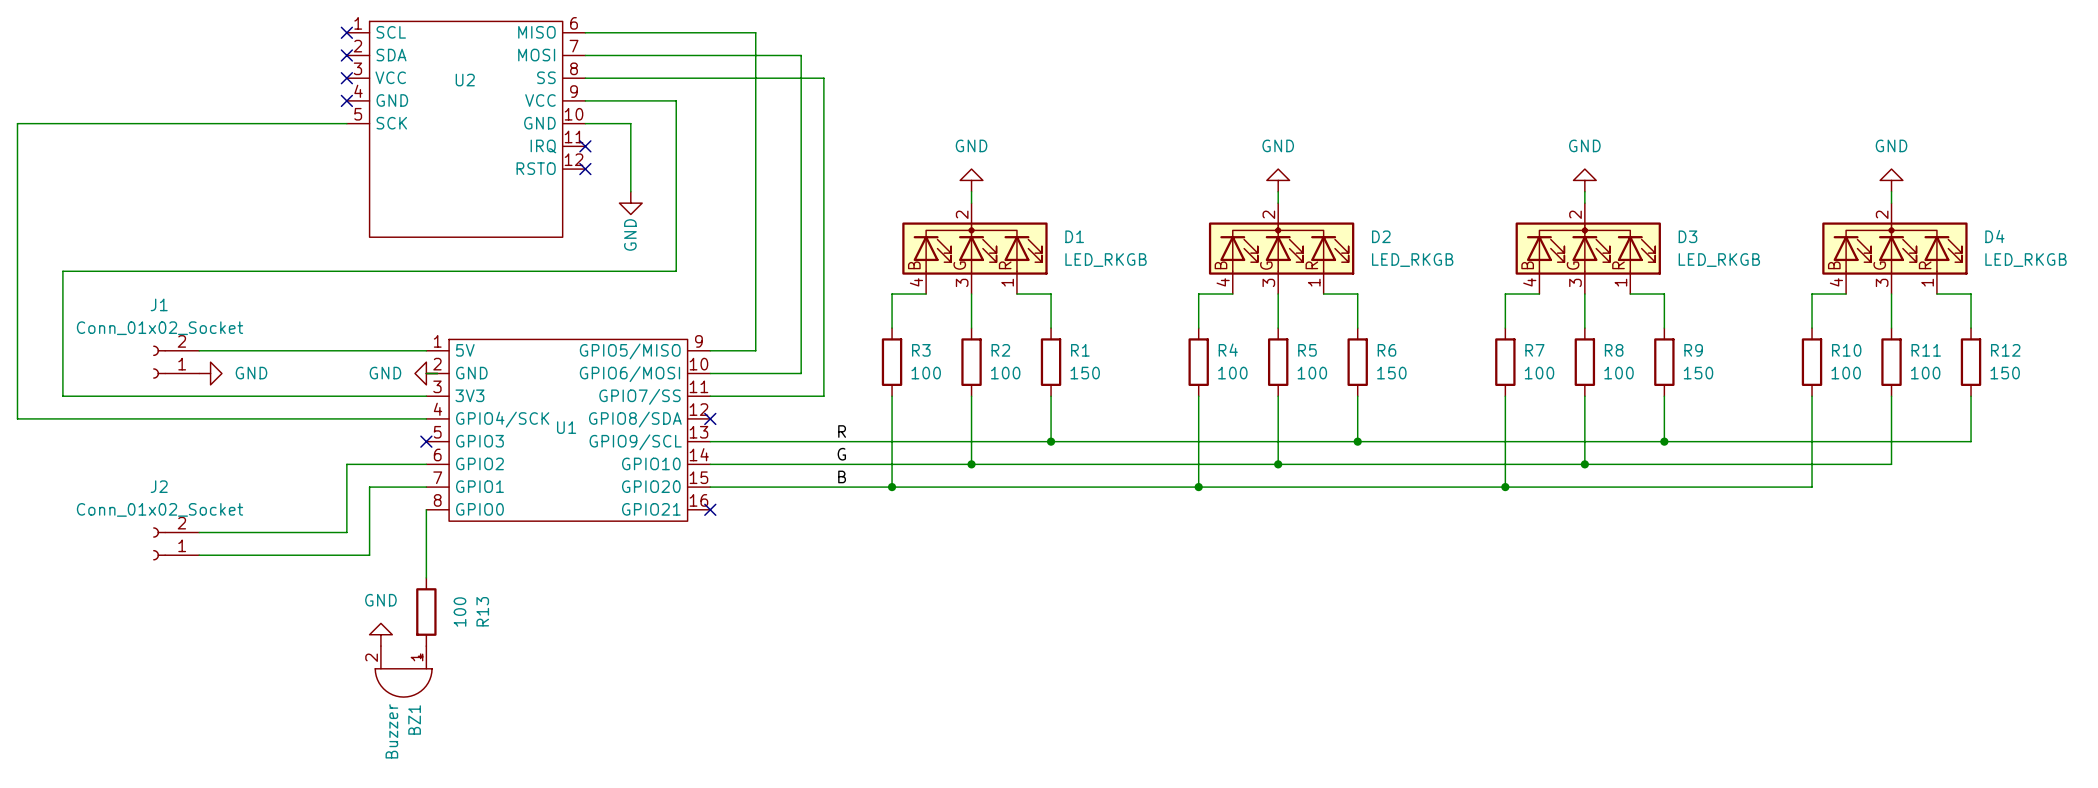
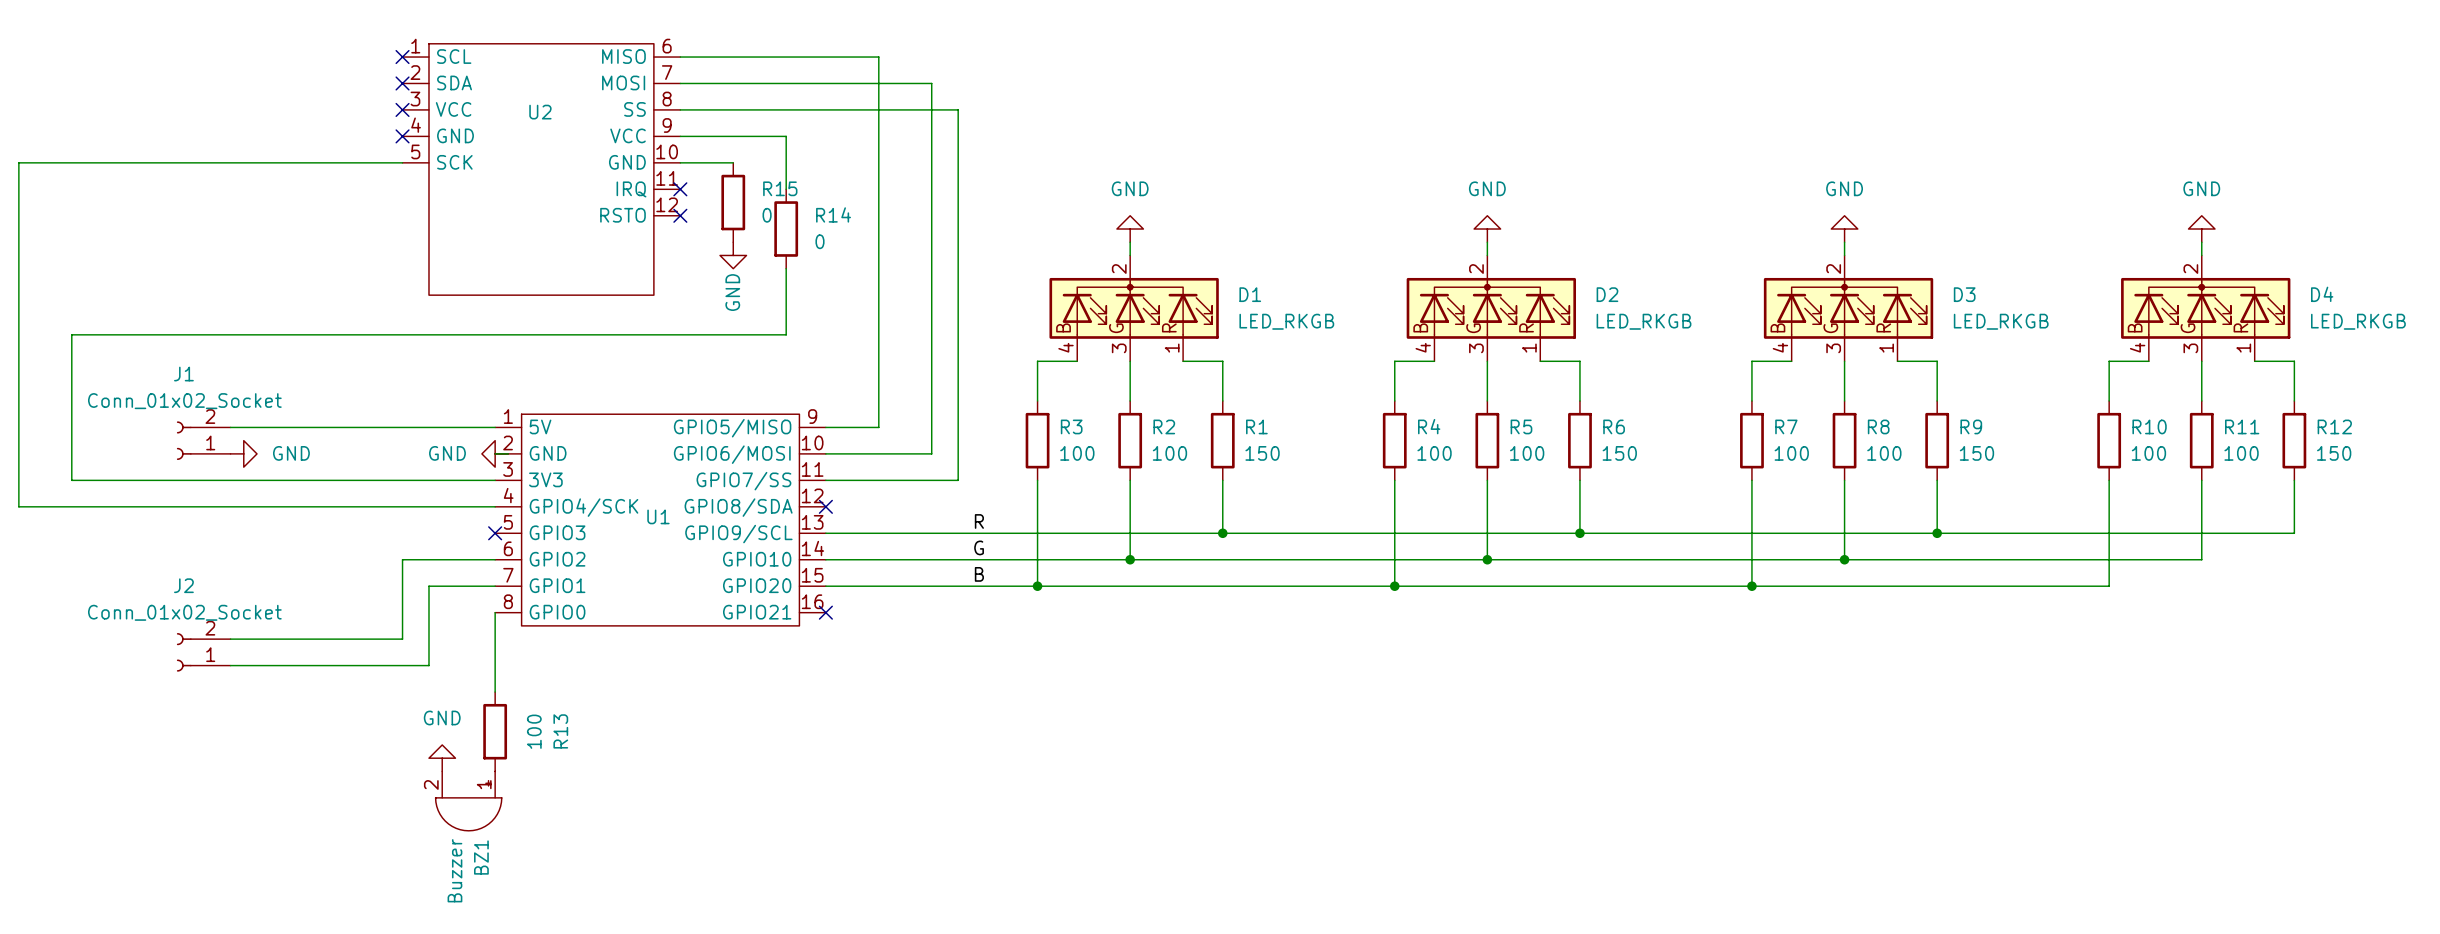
wire: (630, 123) (630, 191) -> none
wire: (676, 146) (676, 214) -> none
R15: none -> 0 (733, 202)
R14: none -> 0 (786, 229)

